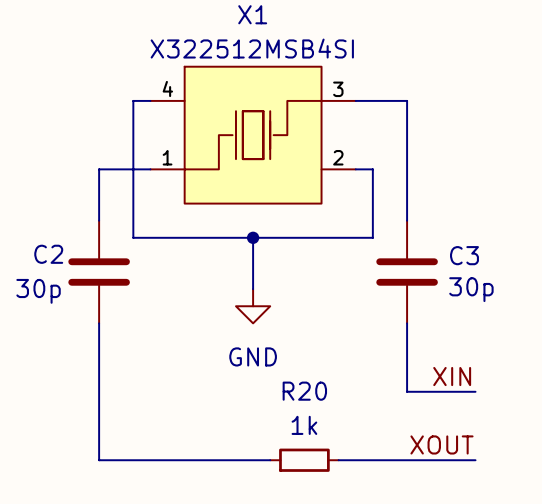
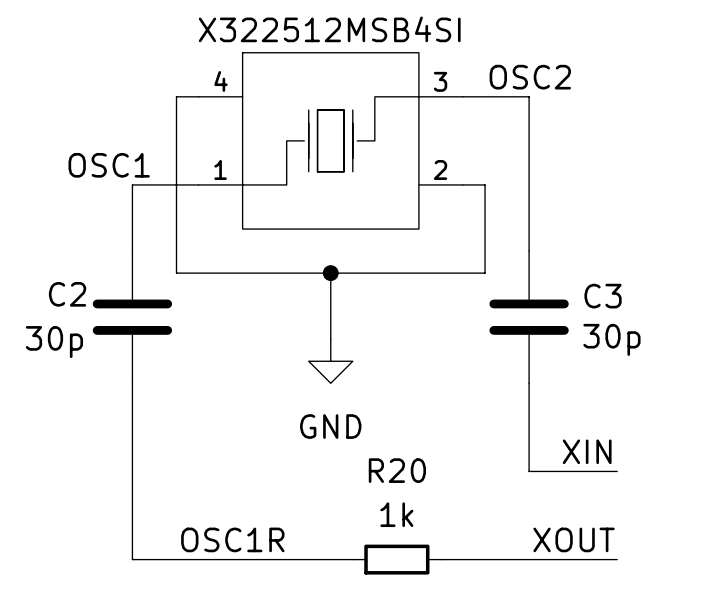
label: none -> OSC2 (530, 77)
label: none -> OSC1 (109, 165)
label: none -> OSC1R (232, 539)

